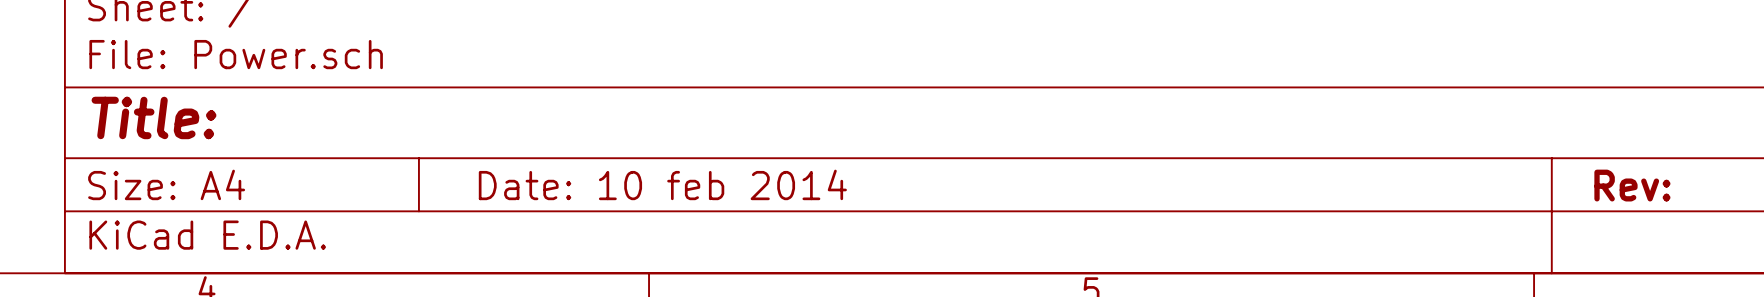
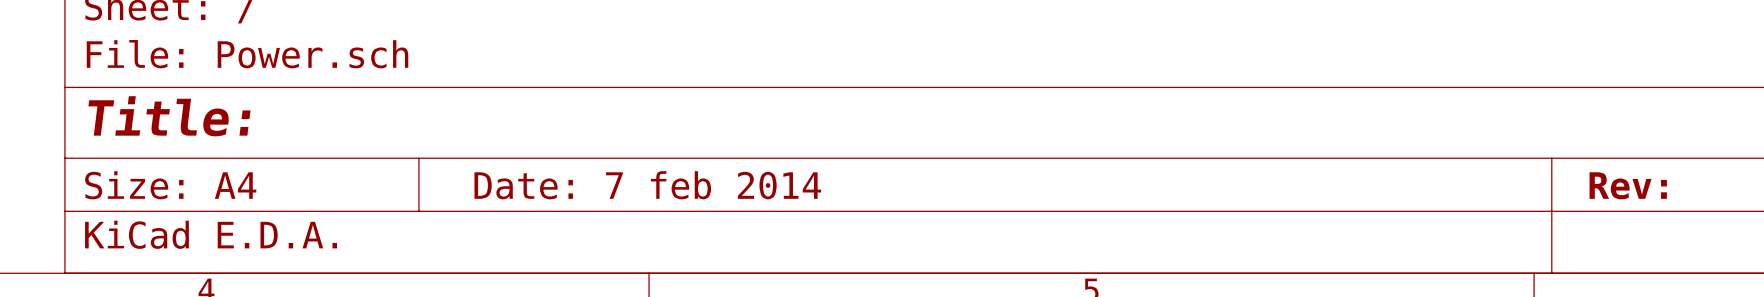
title block: Date: 10 feb 2014 (662, 184) -> Date: 7 feb 2014 (647, 185)

